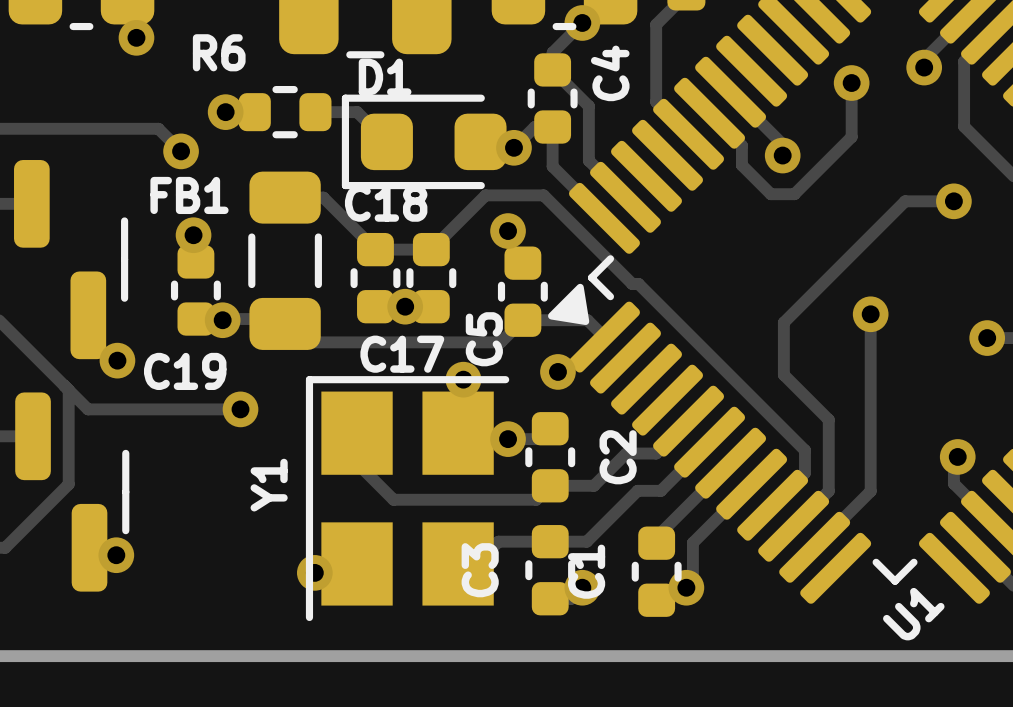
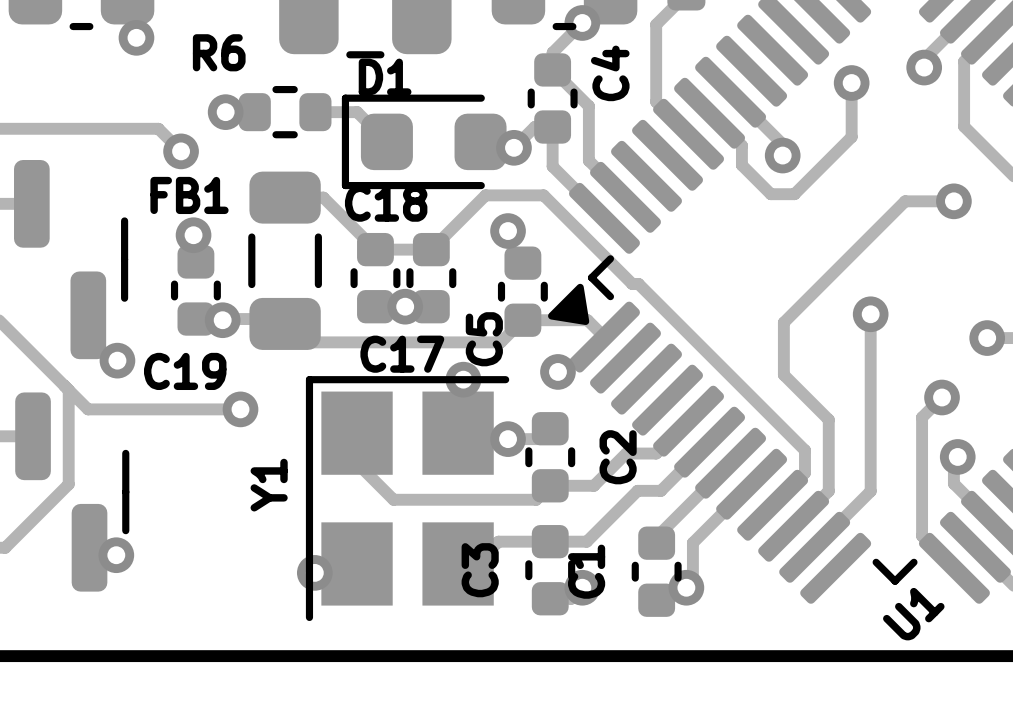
track: none -> (942, 397) (922, 417) (922, 535) (954, 568)
via: none -> (942, 397)

